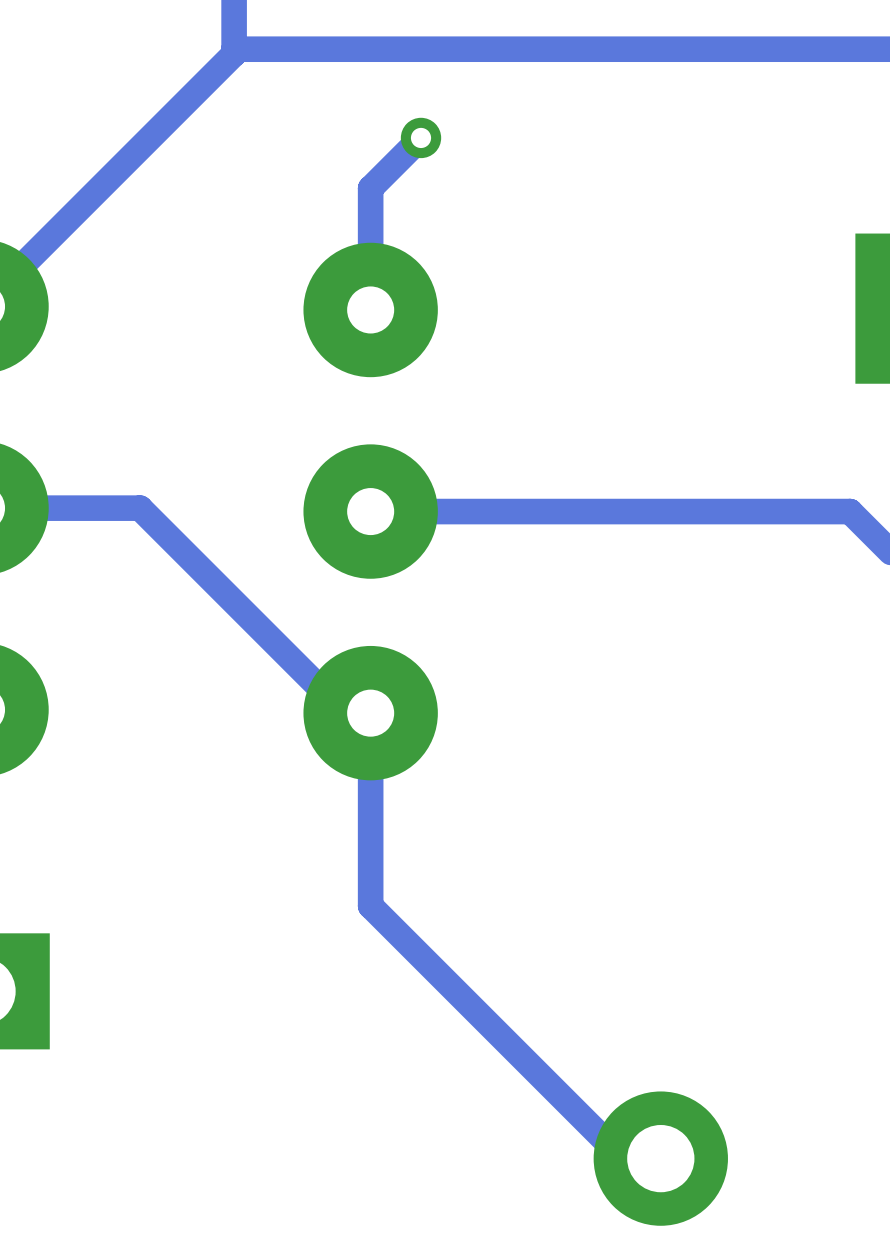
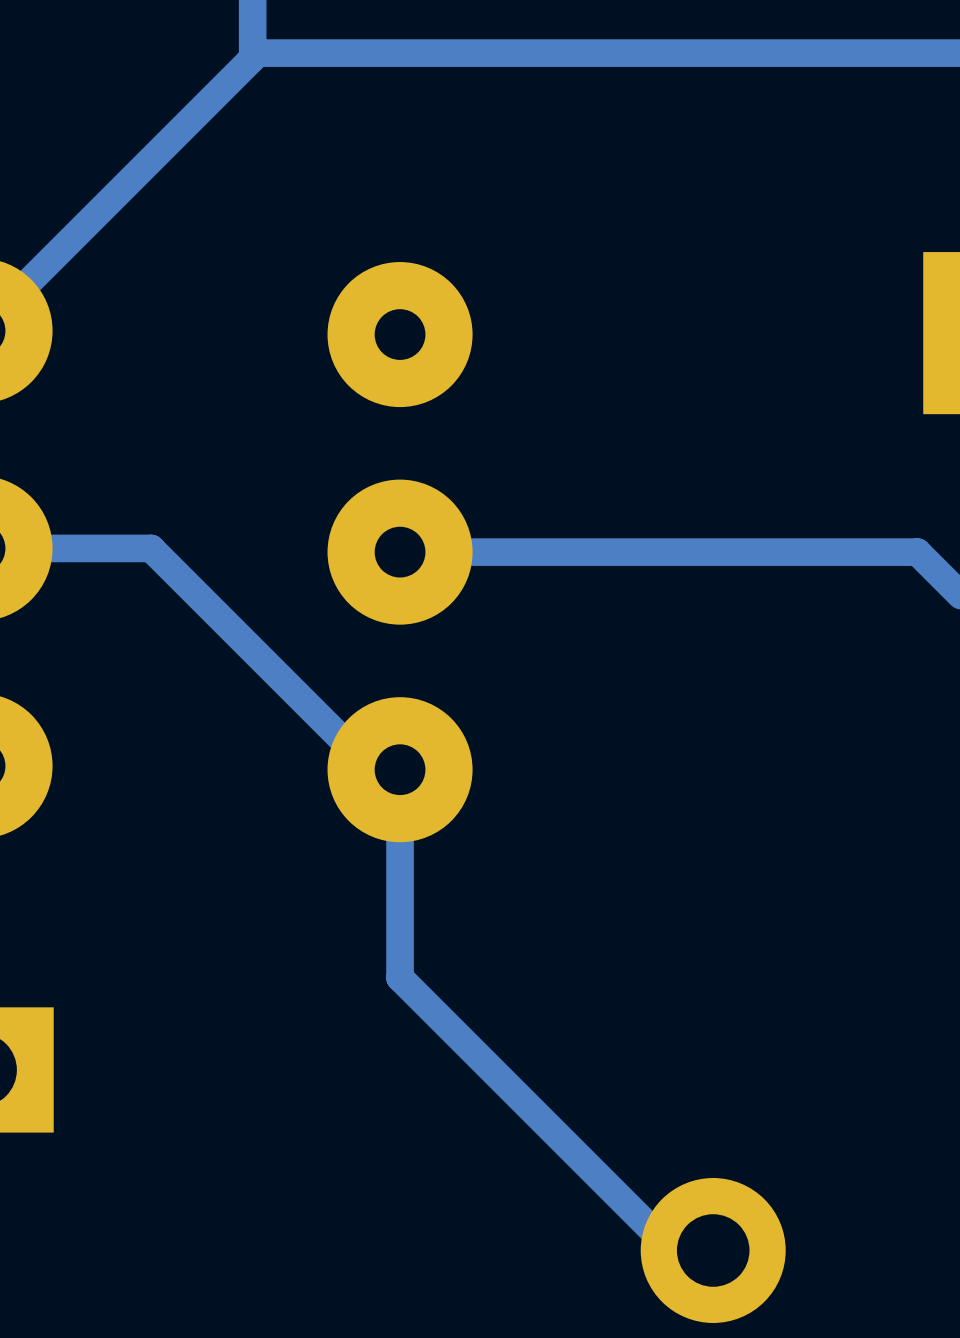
track: (421, 137) (370, 188) (370, 309) -> none
via: (421, 137) -> none

